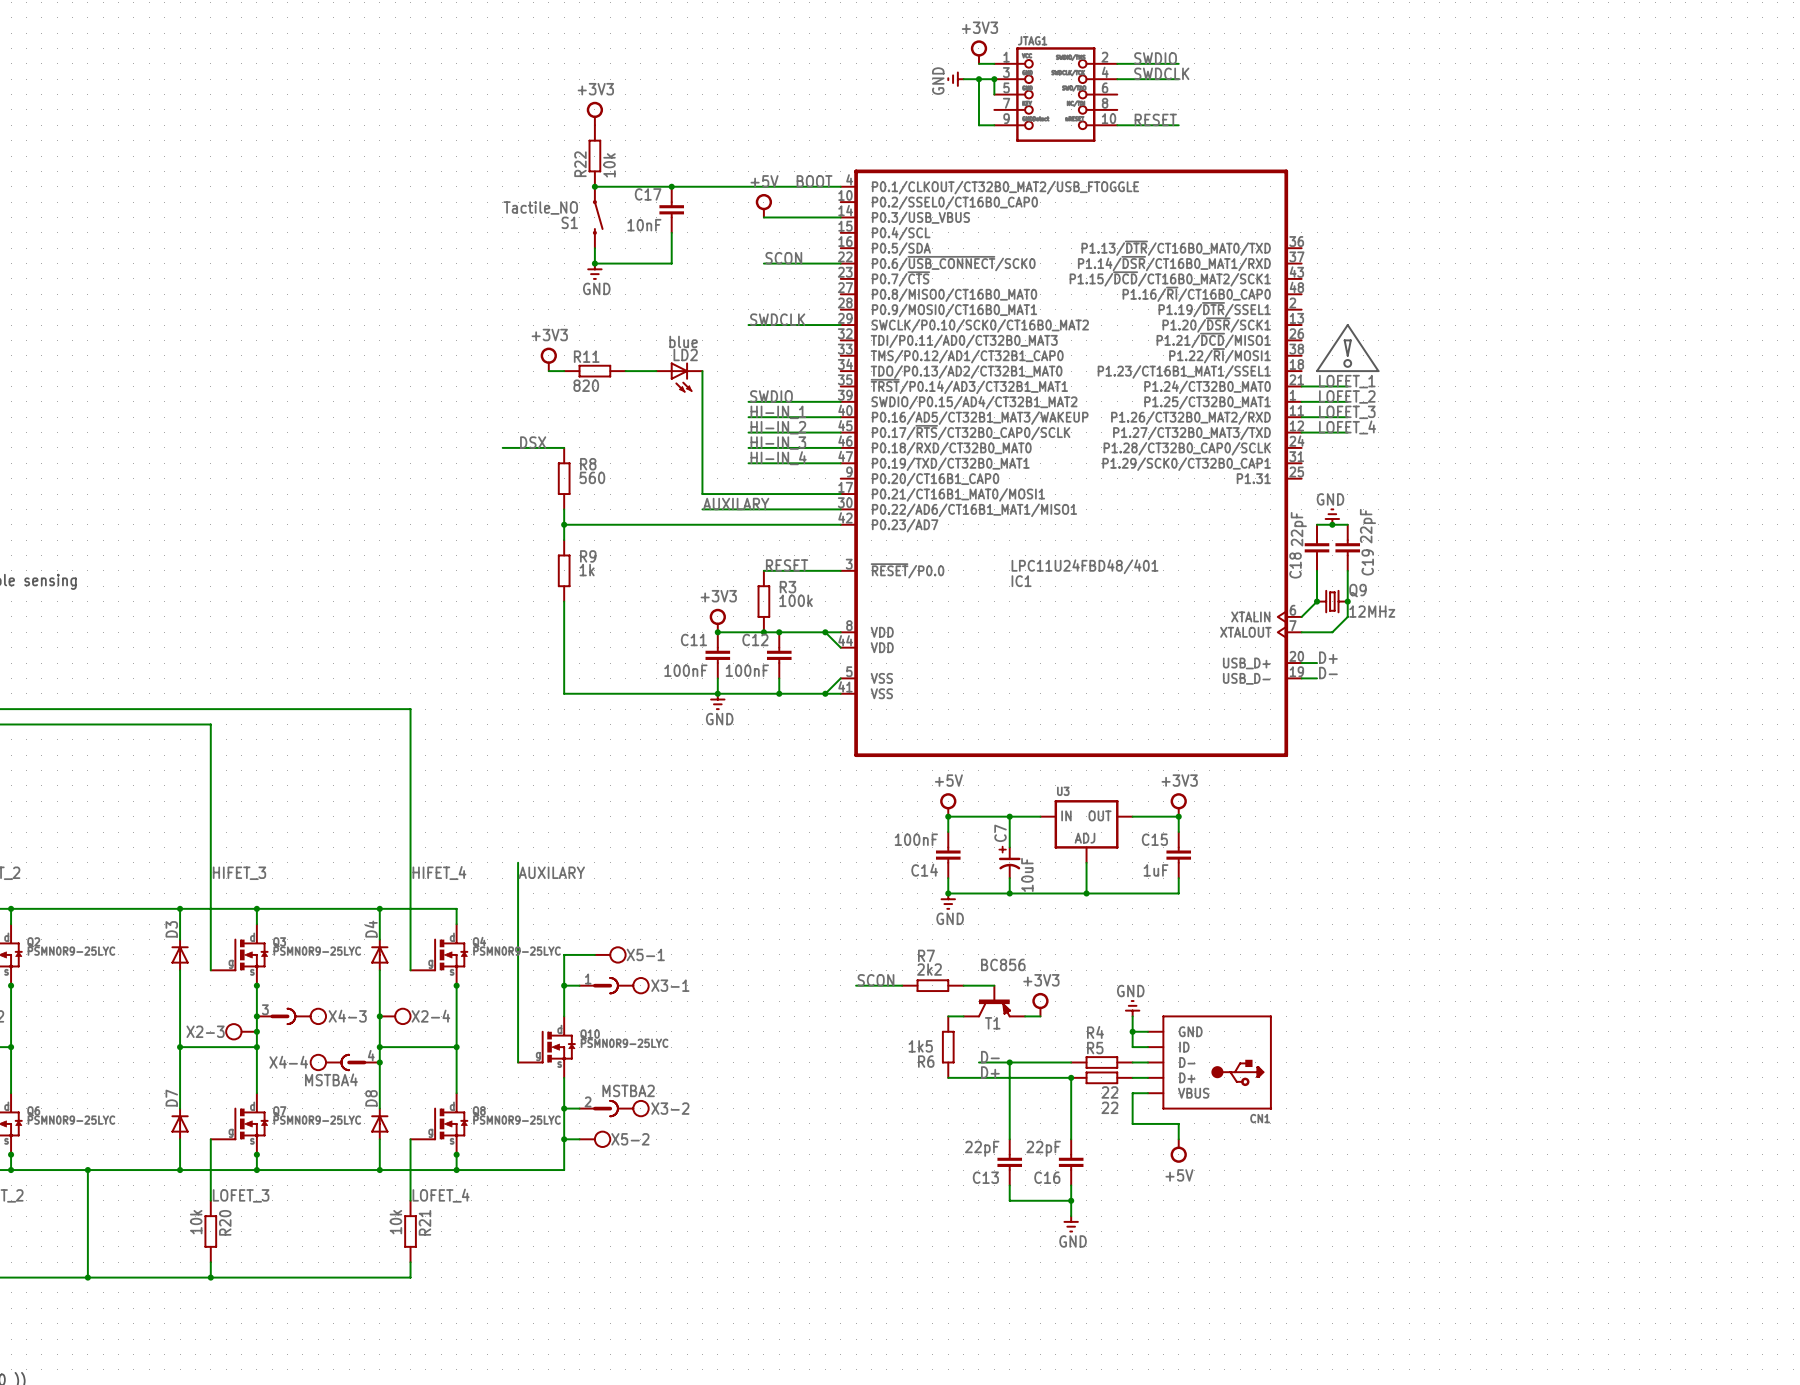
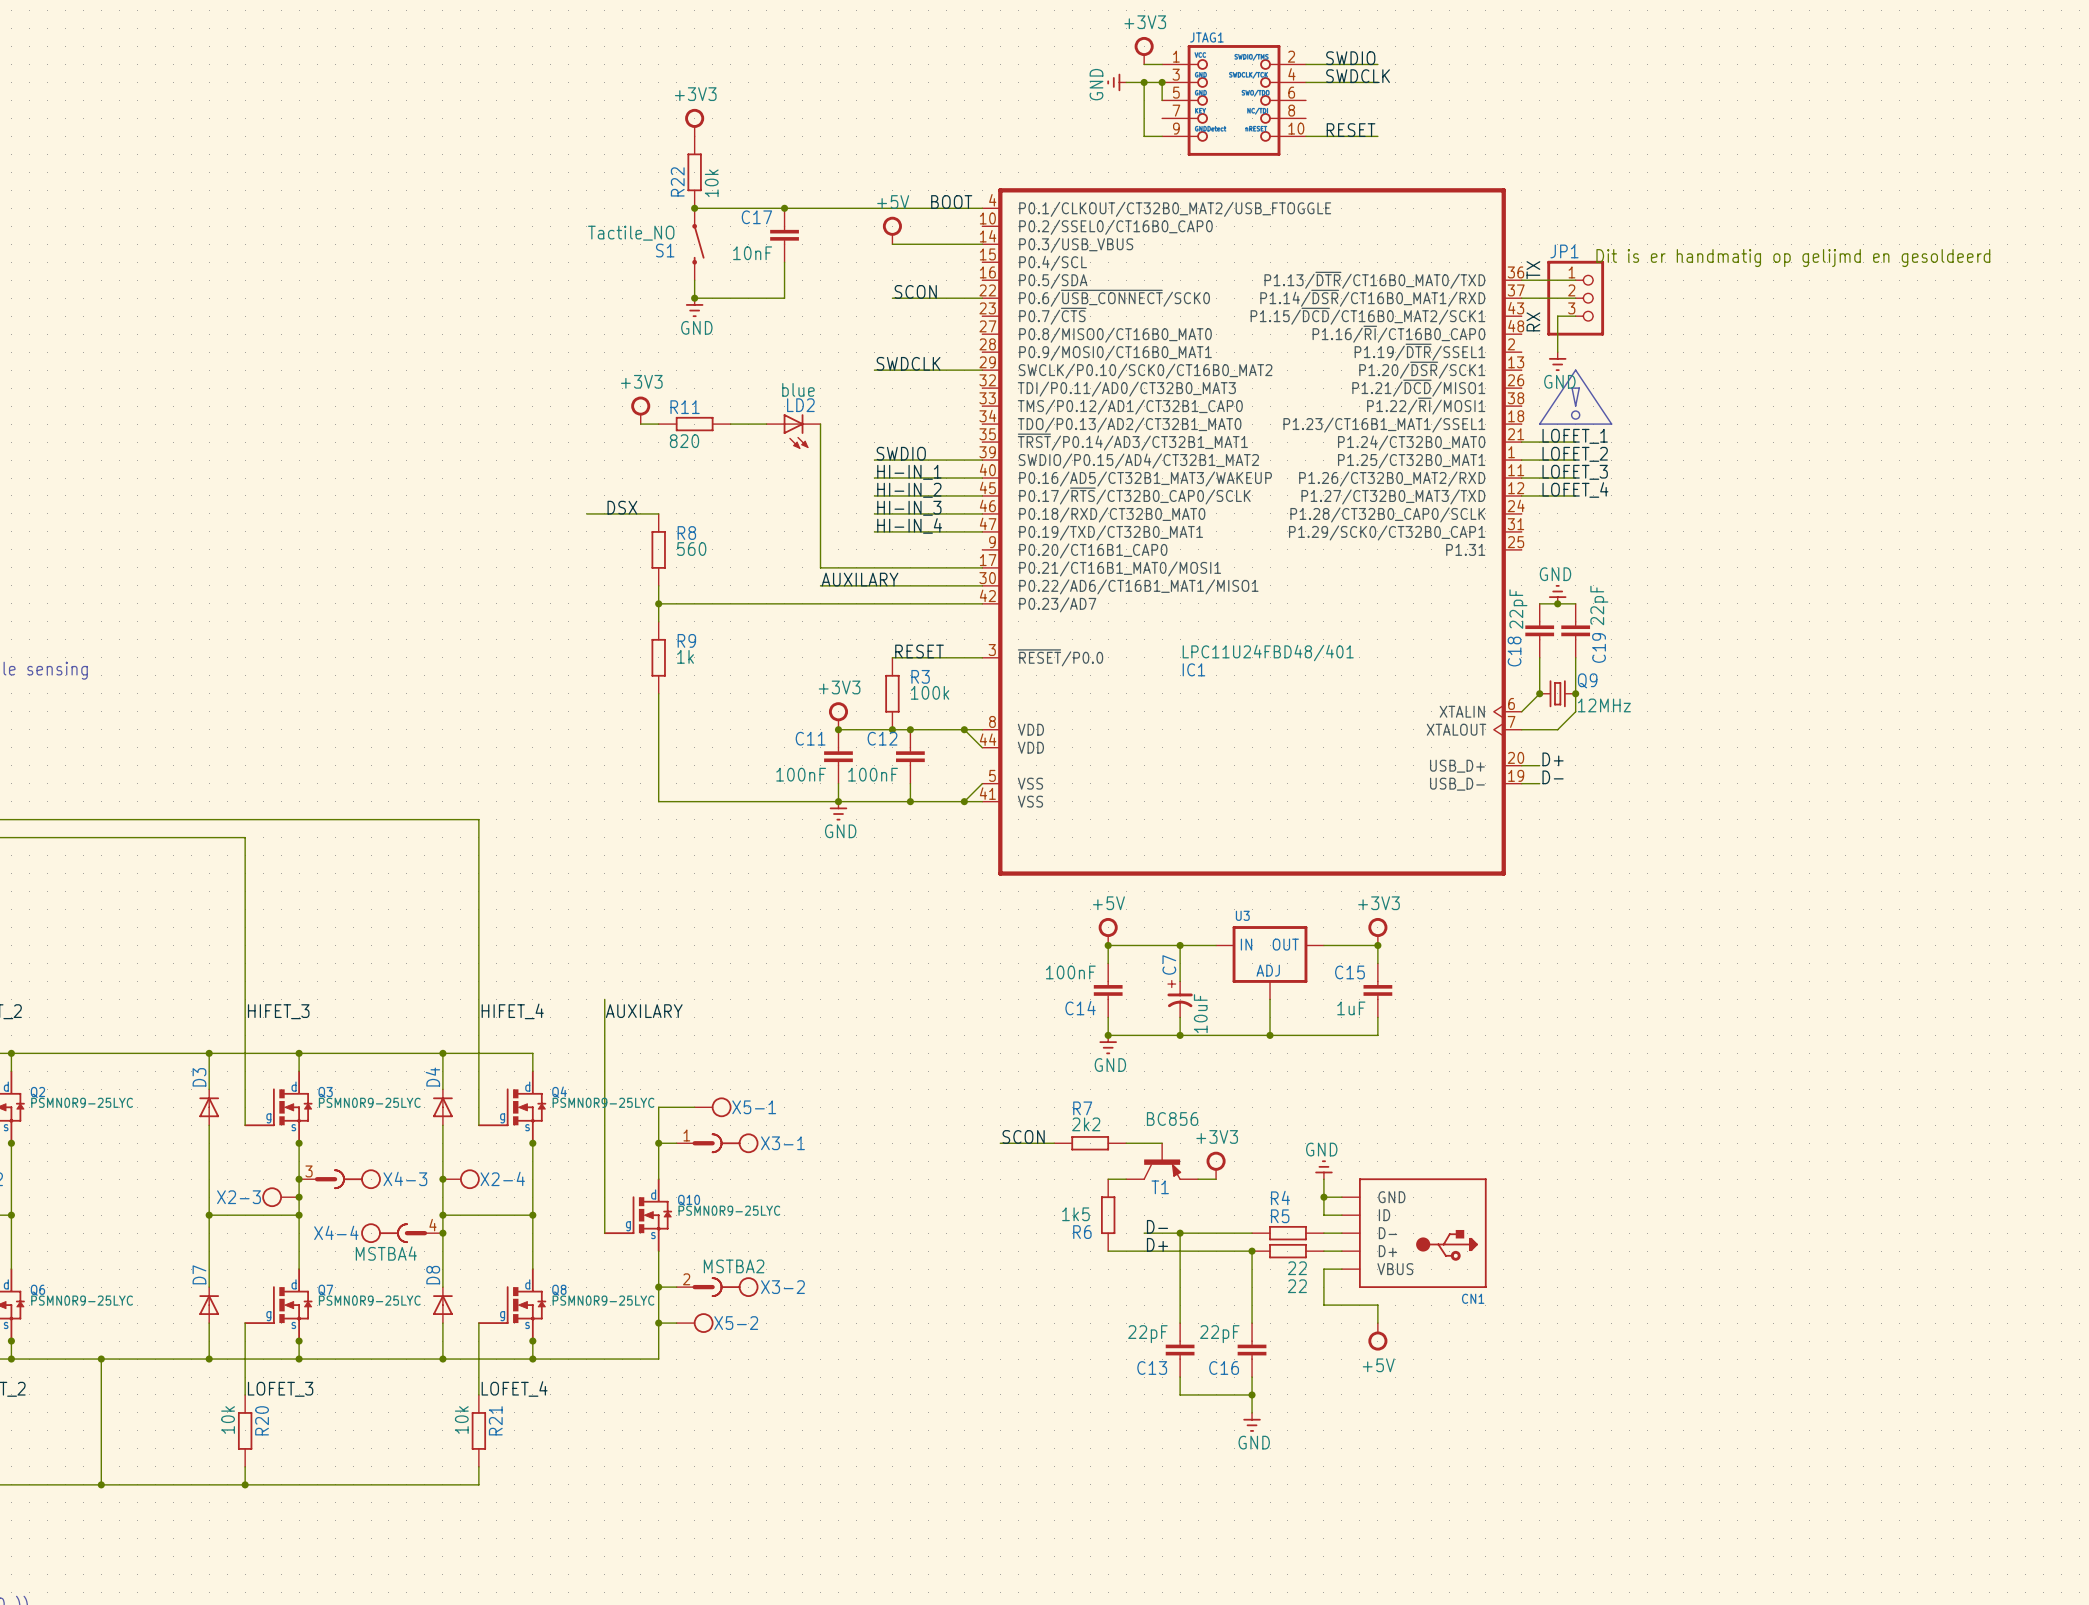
text: none -> Dit is er handmatig op gelijmd en gesoldeerd (1793, 258)
label: none -> TX (1533, 270)
wire: none -> (1521, 280) (1575, 280)
wire: none -> (1521, 298) (1575, 298)
JP1: none -> (1575, 298)
wire: none -> (1575, 316) (1557, 316) (1557, 352)
label: none -> RX (1533, 321)
power symbol: none -> GND (1557, 361)

